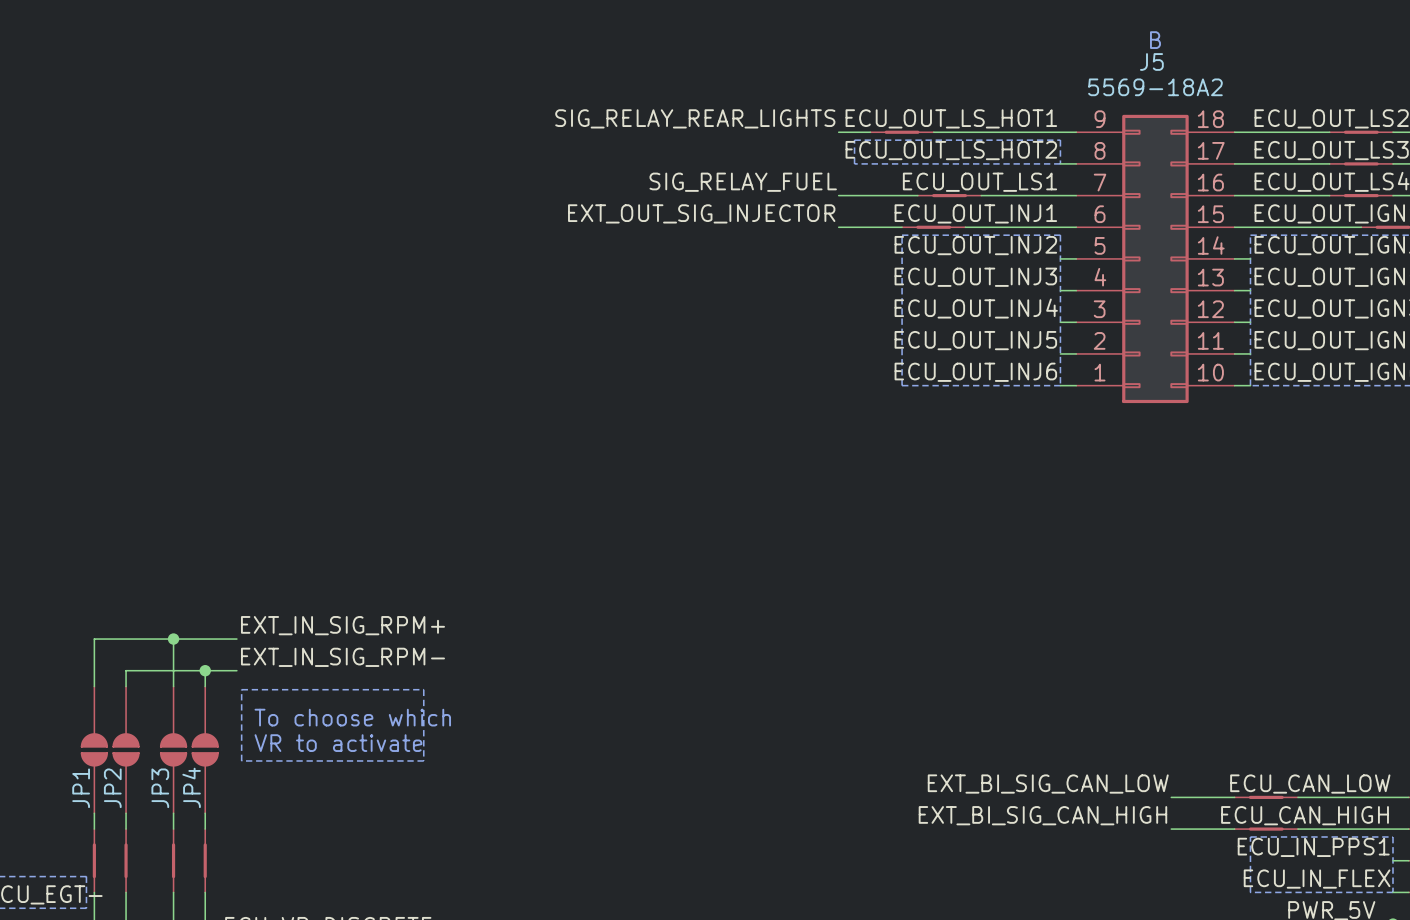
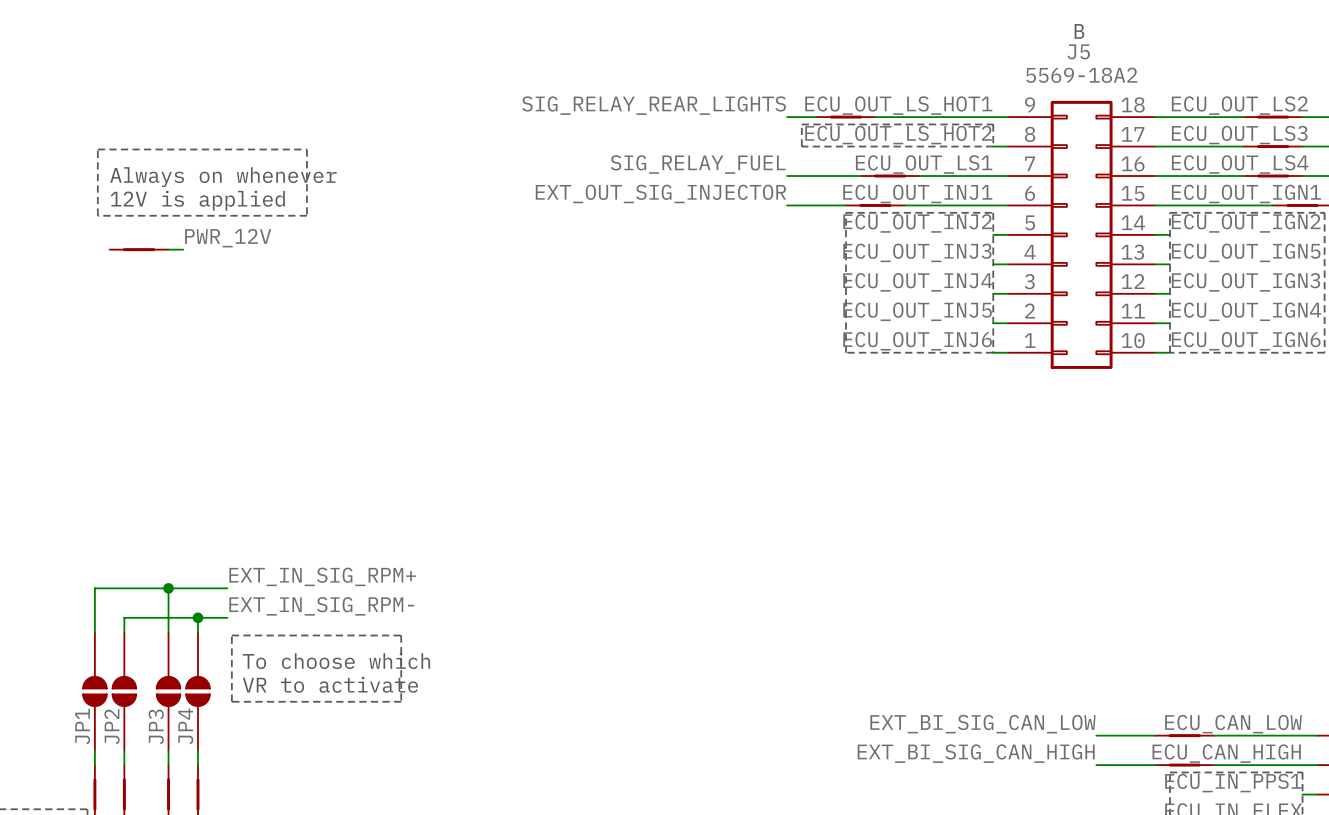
line: none -> (97, 149) (306, 149) (306, 215) (97, 215) (97, 149)
text: none -> Always on whenever (223, 177)
text: none -> 12V is applied (197, 200)
label: none -> PWR_12V (228, 238)
part: none -> (139, 249)
wire: none -> (168, 249) (183, 249)

